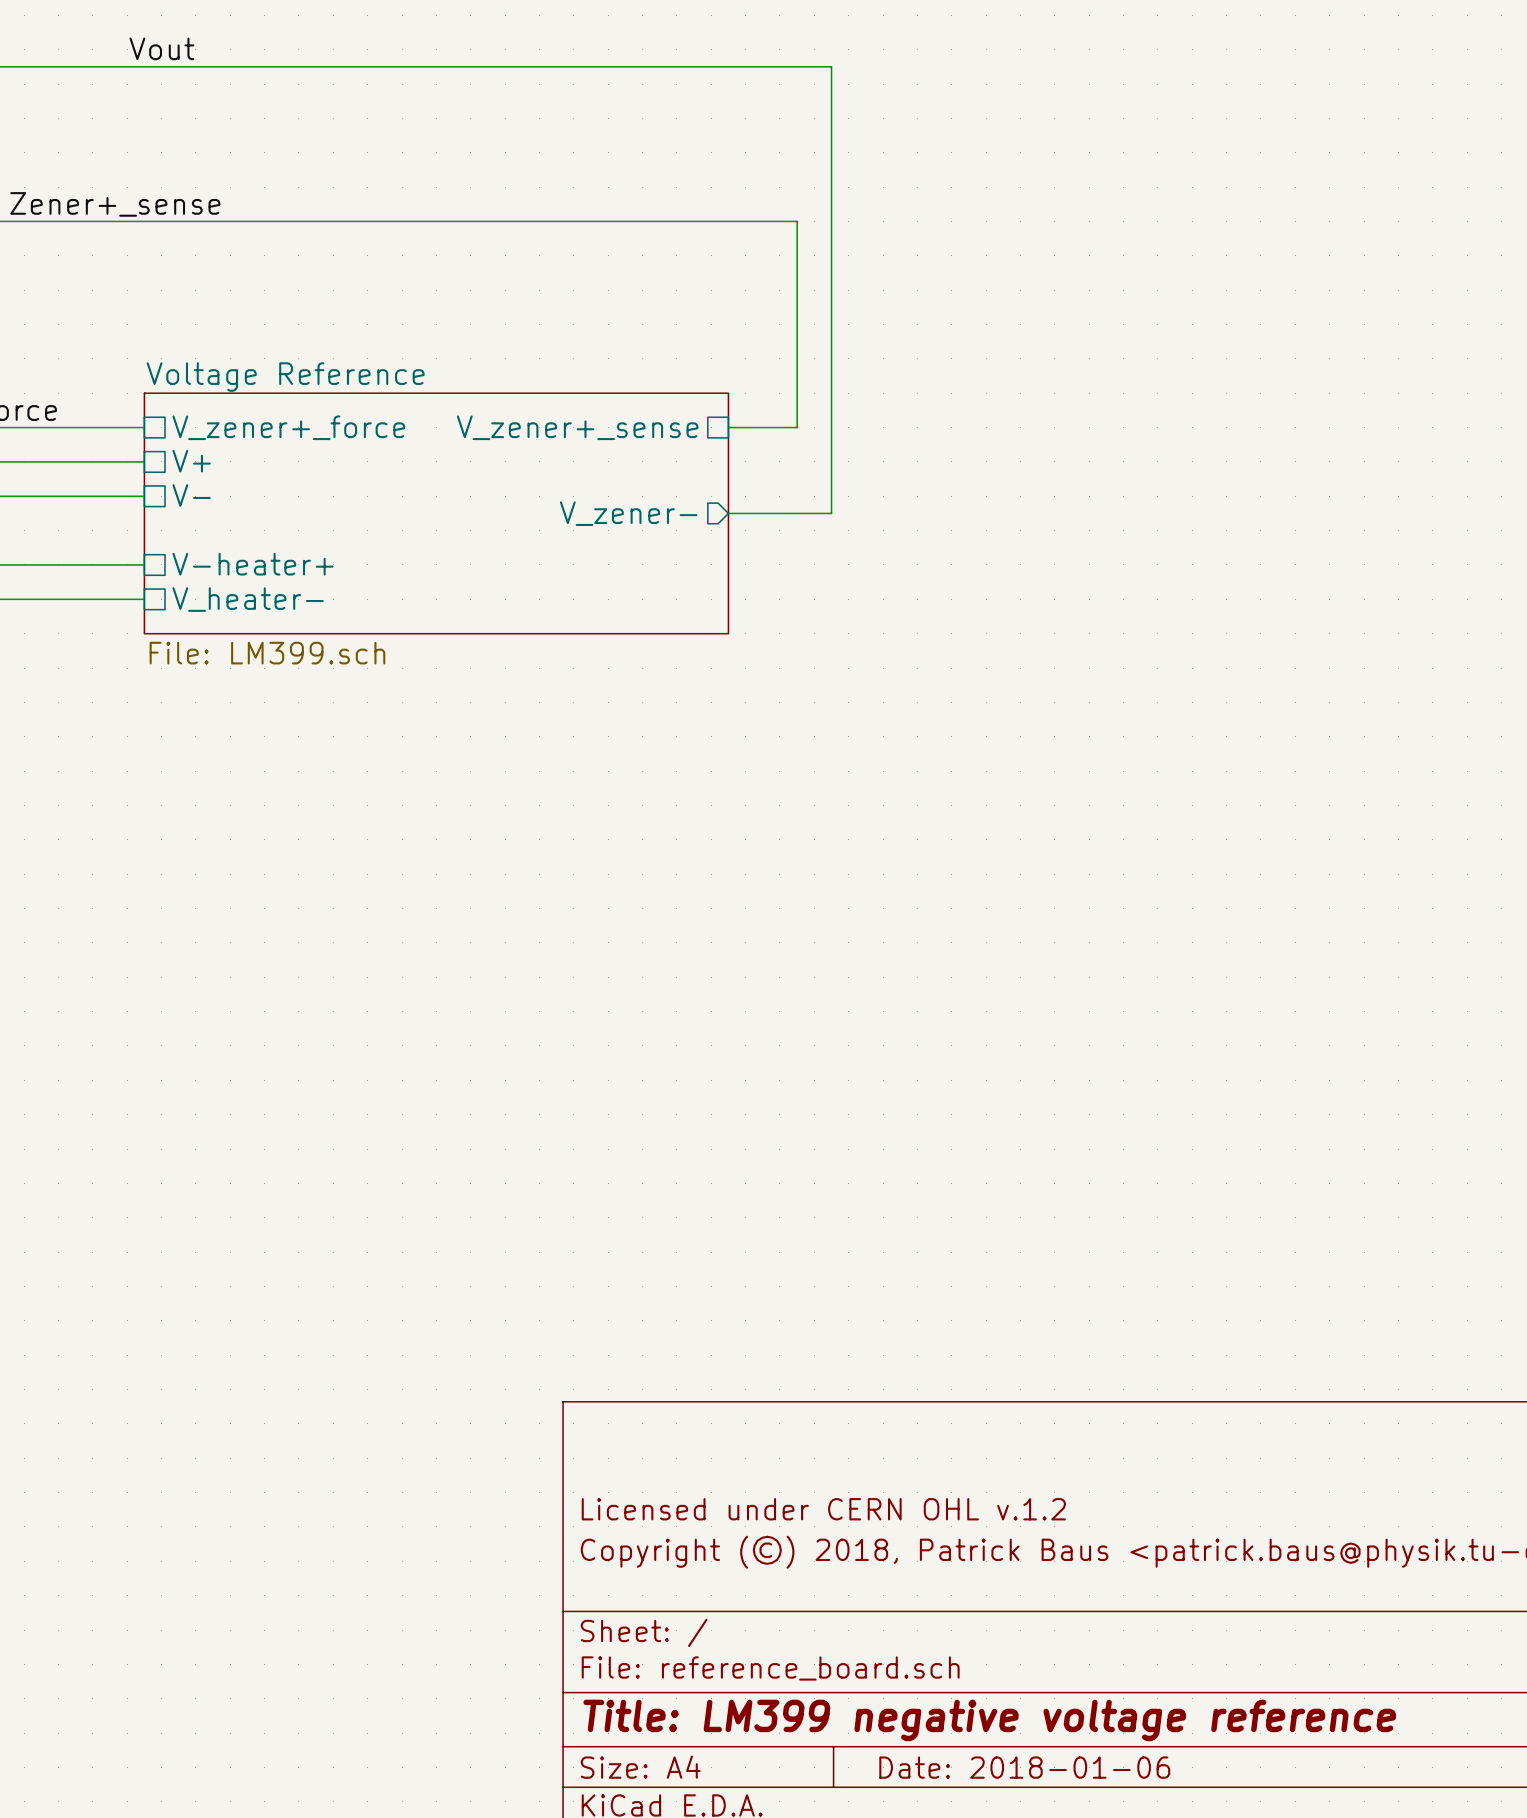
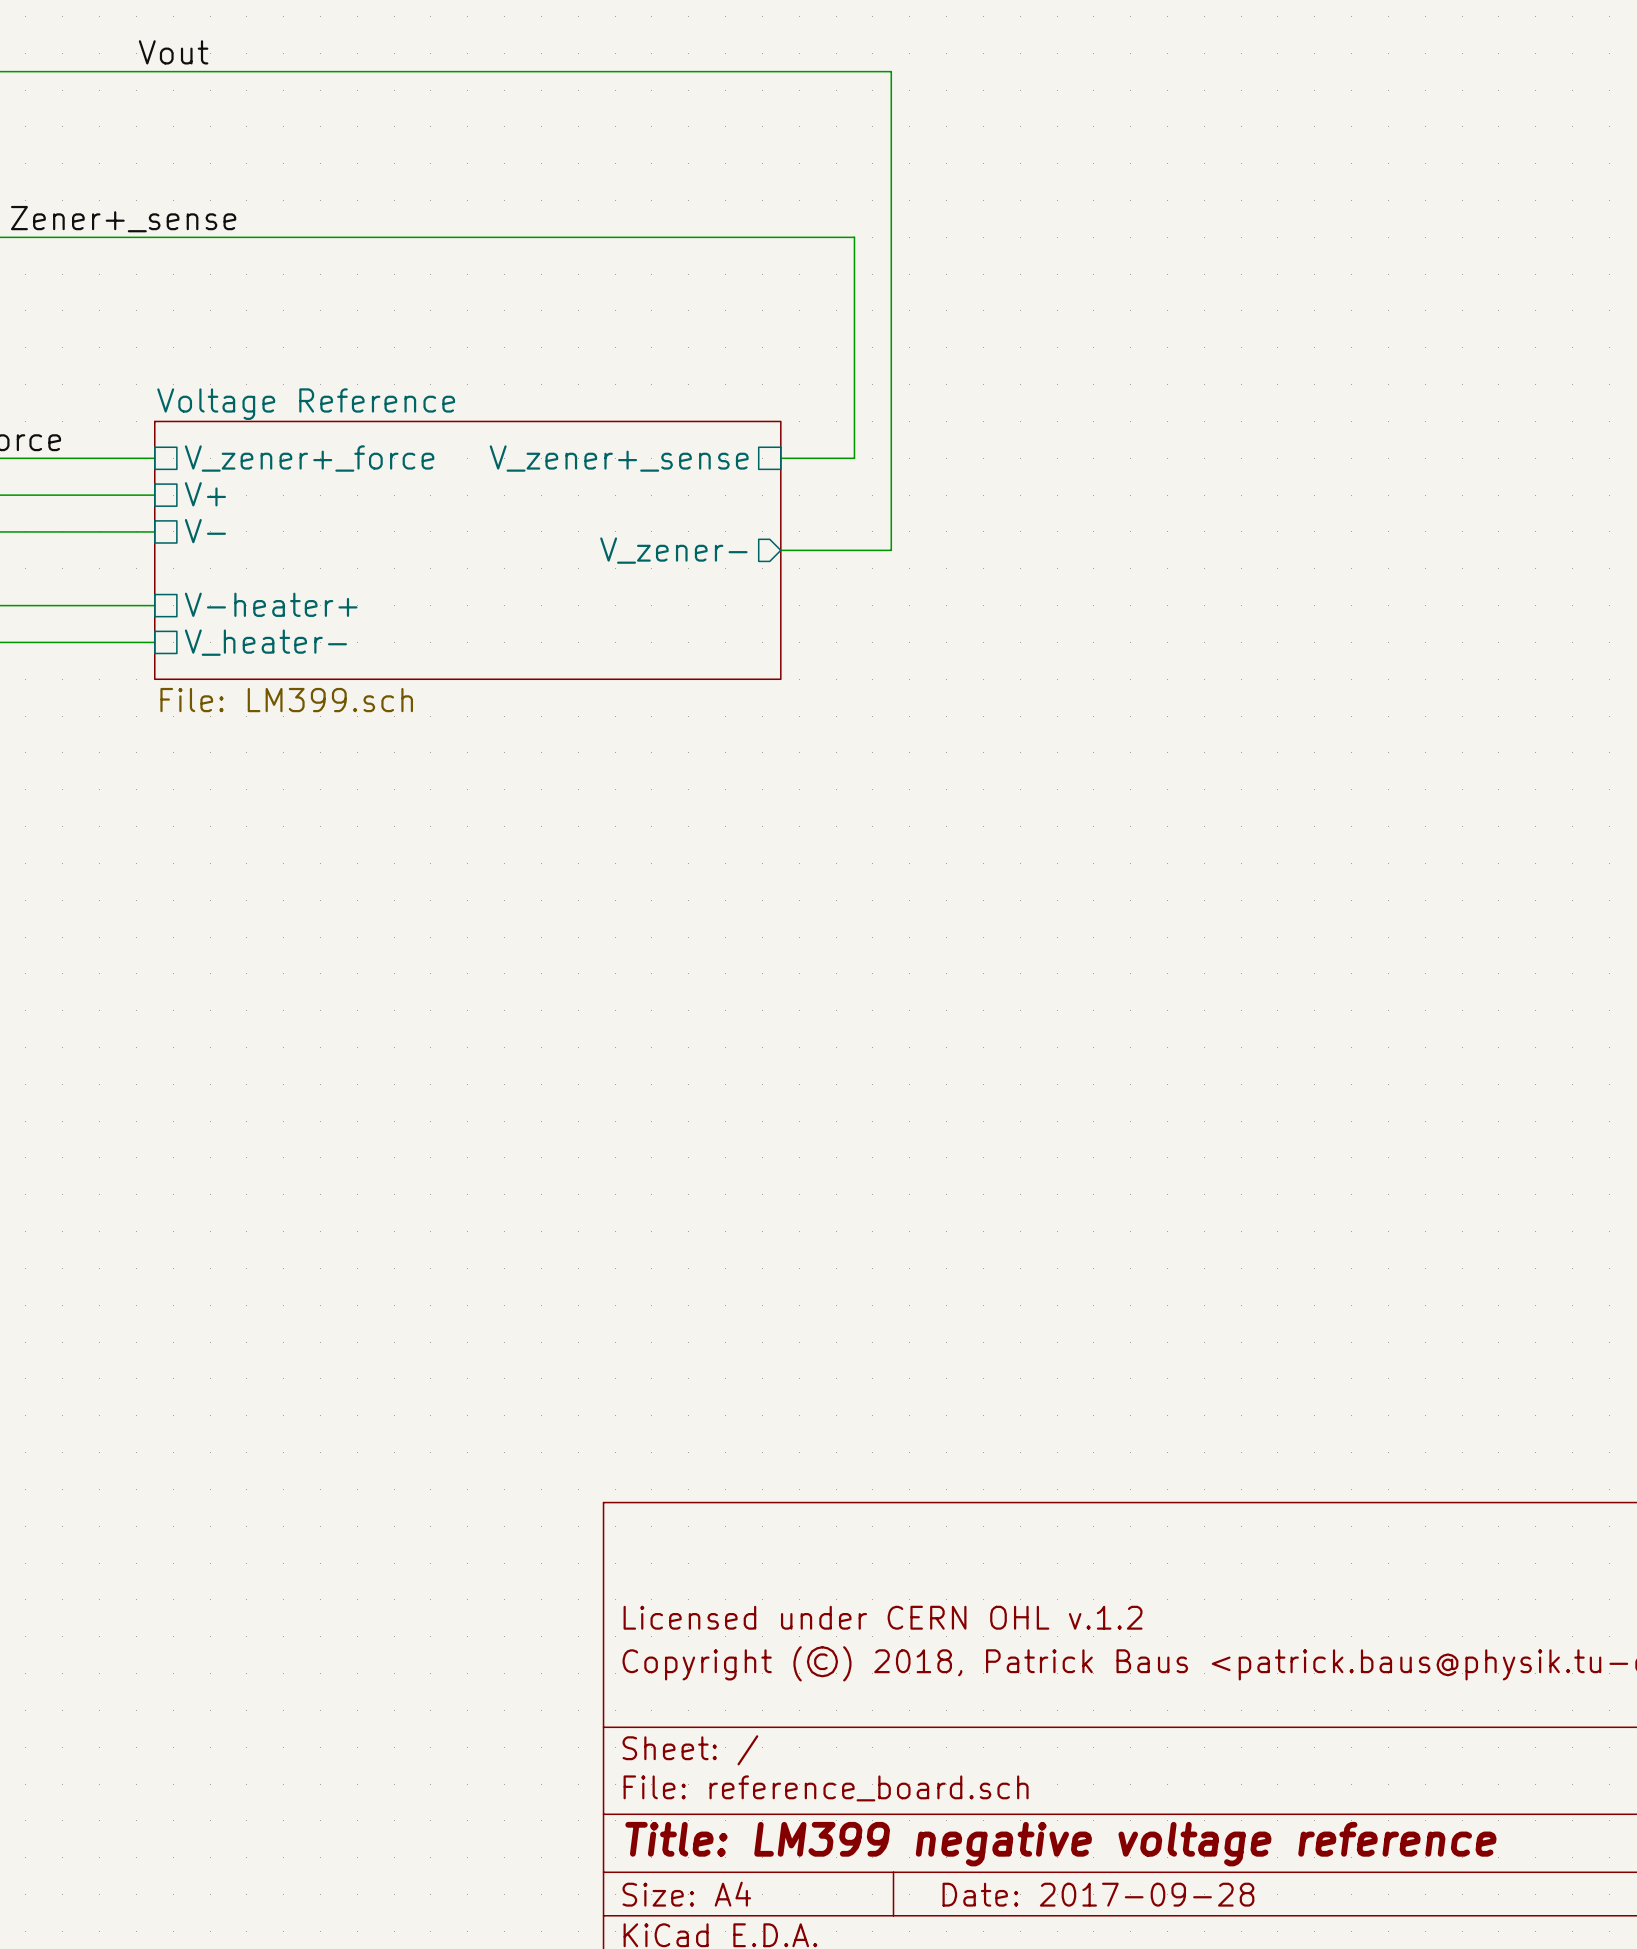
title block: Date: 2018-01-06 (1024, 1767) -> Date: 2017-09-28 (1098, 1894)

